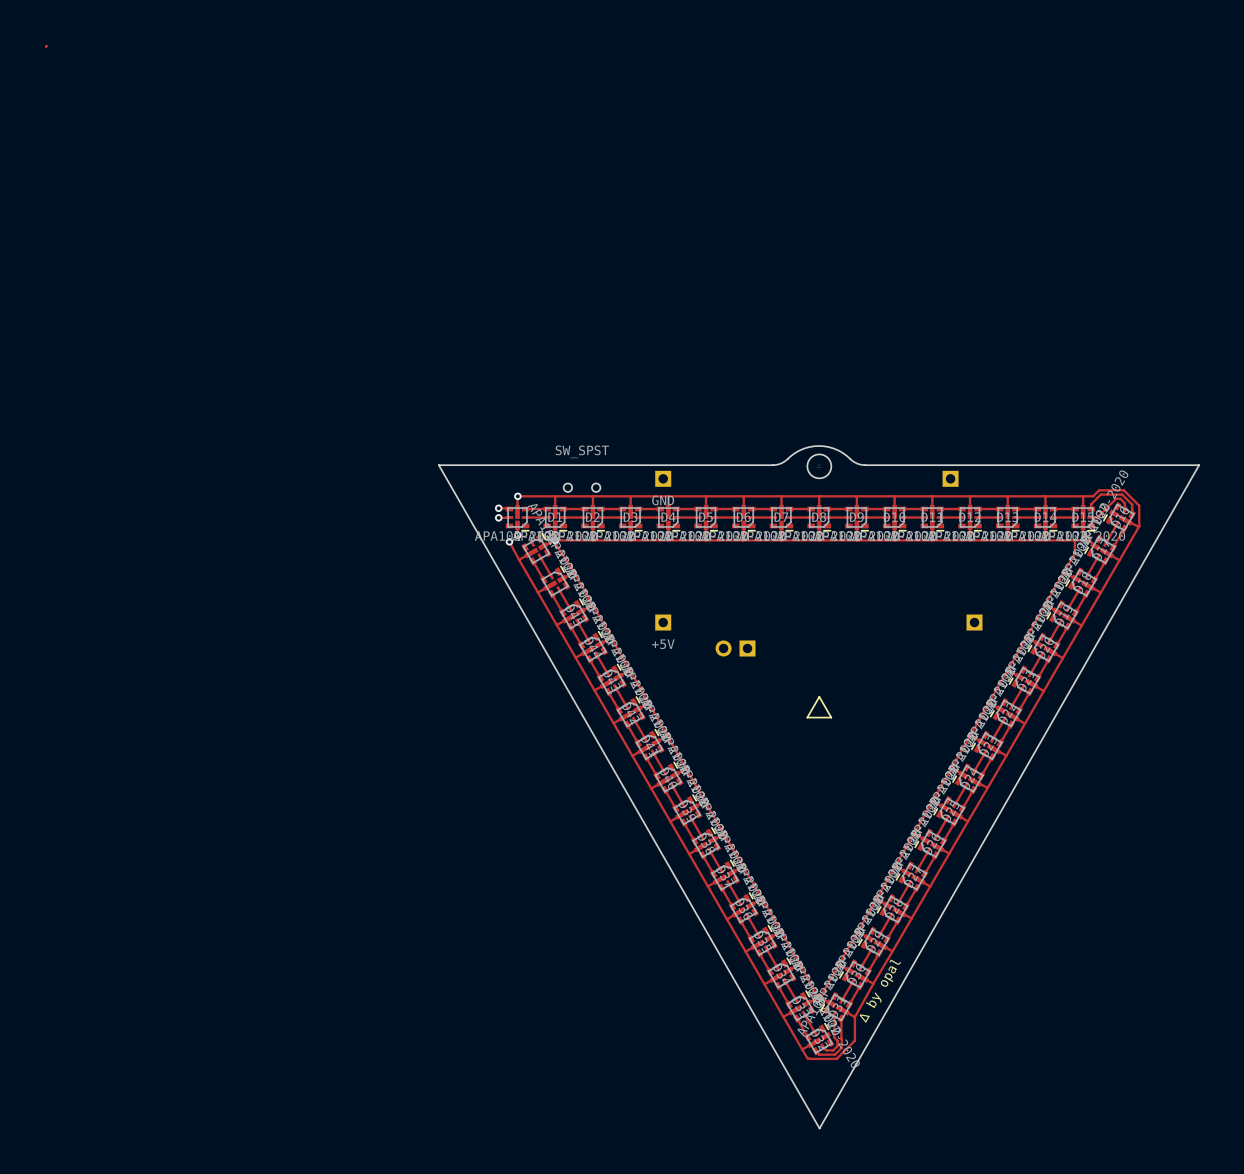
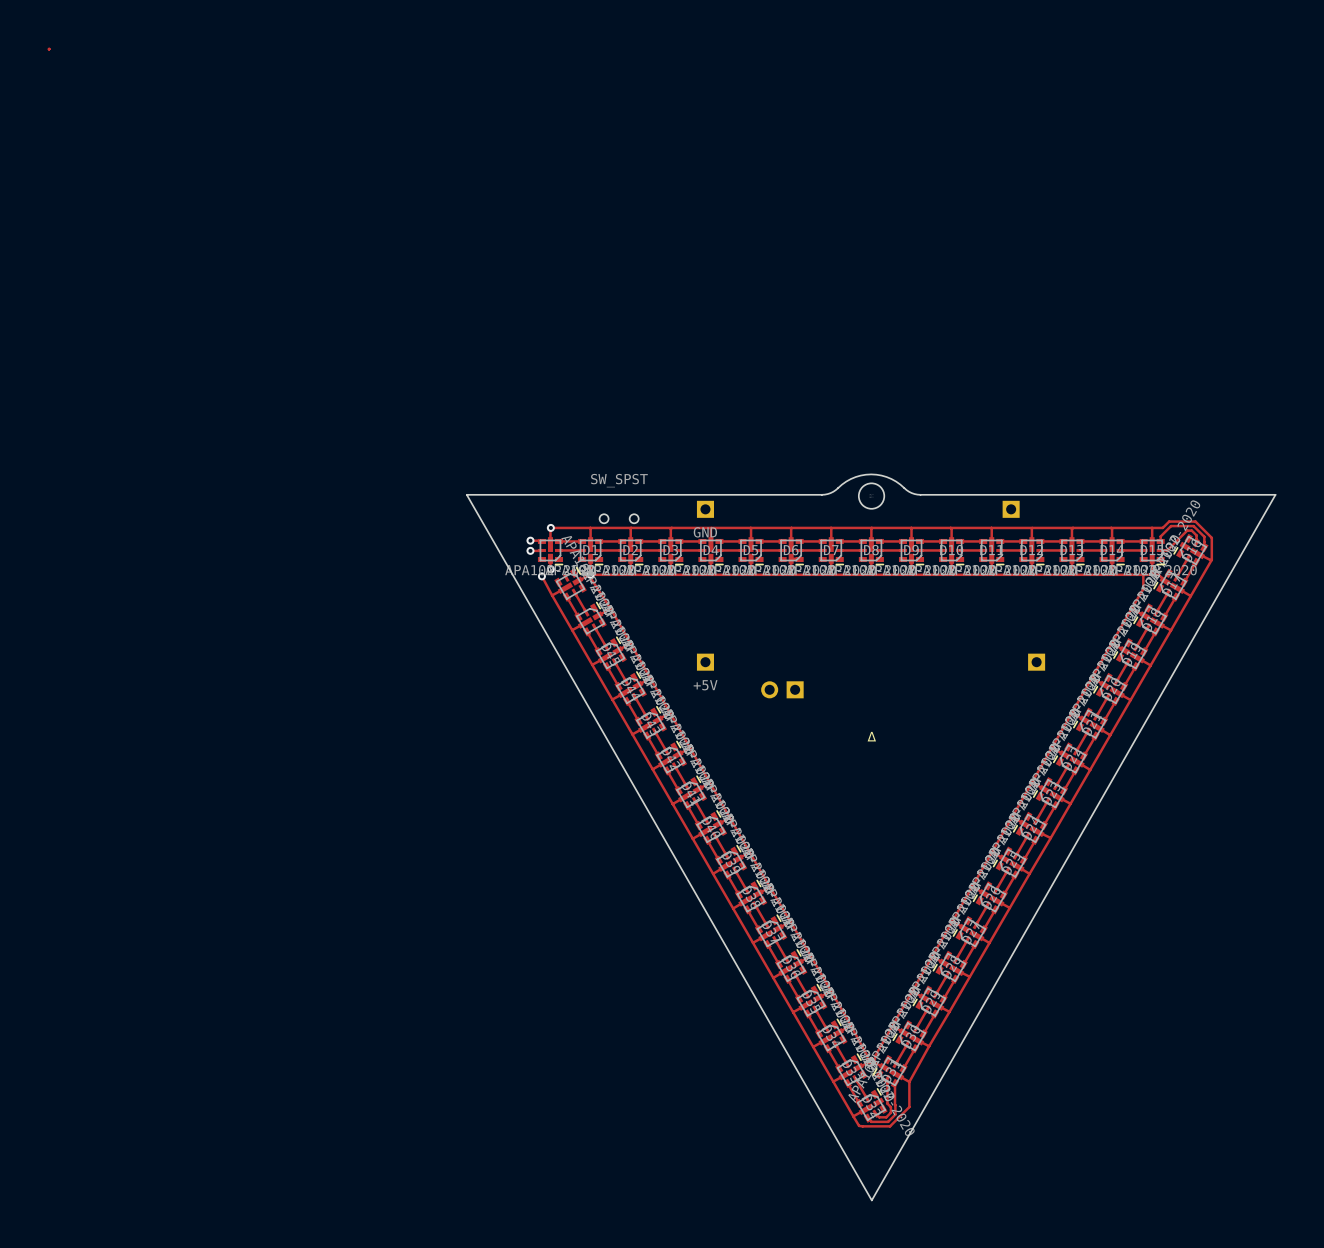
text: none -> ∆ (871, 736)
line: (819, 696) (831, 717) (807, 717) (819, 696) -> none
text: ∆ by opal (880, 991) -> none

